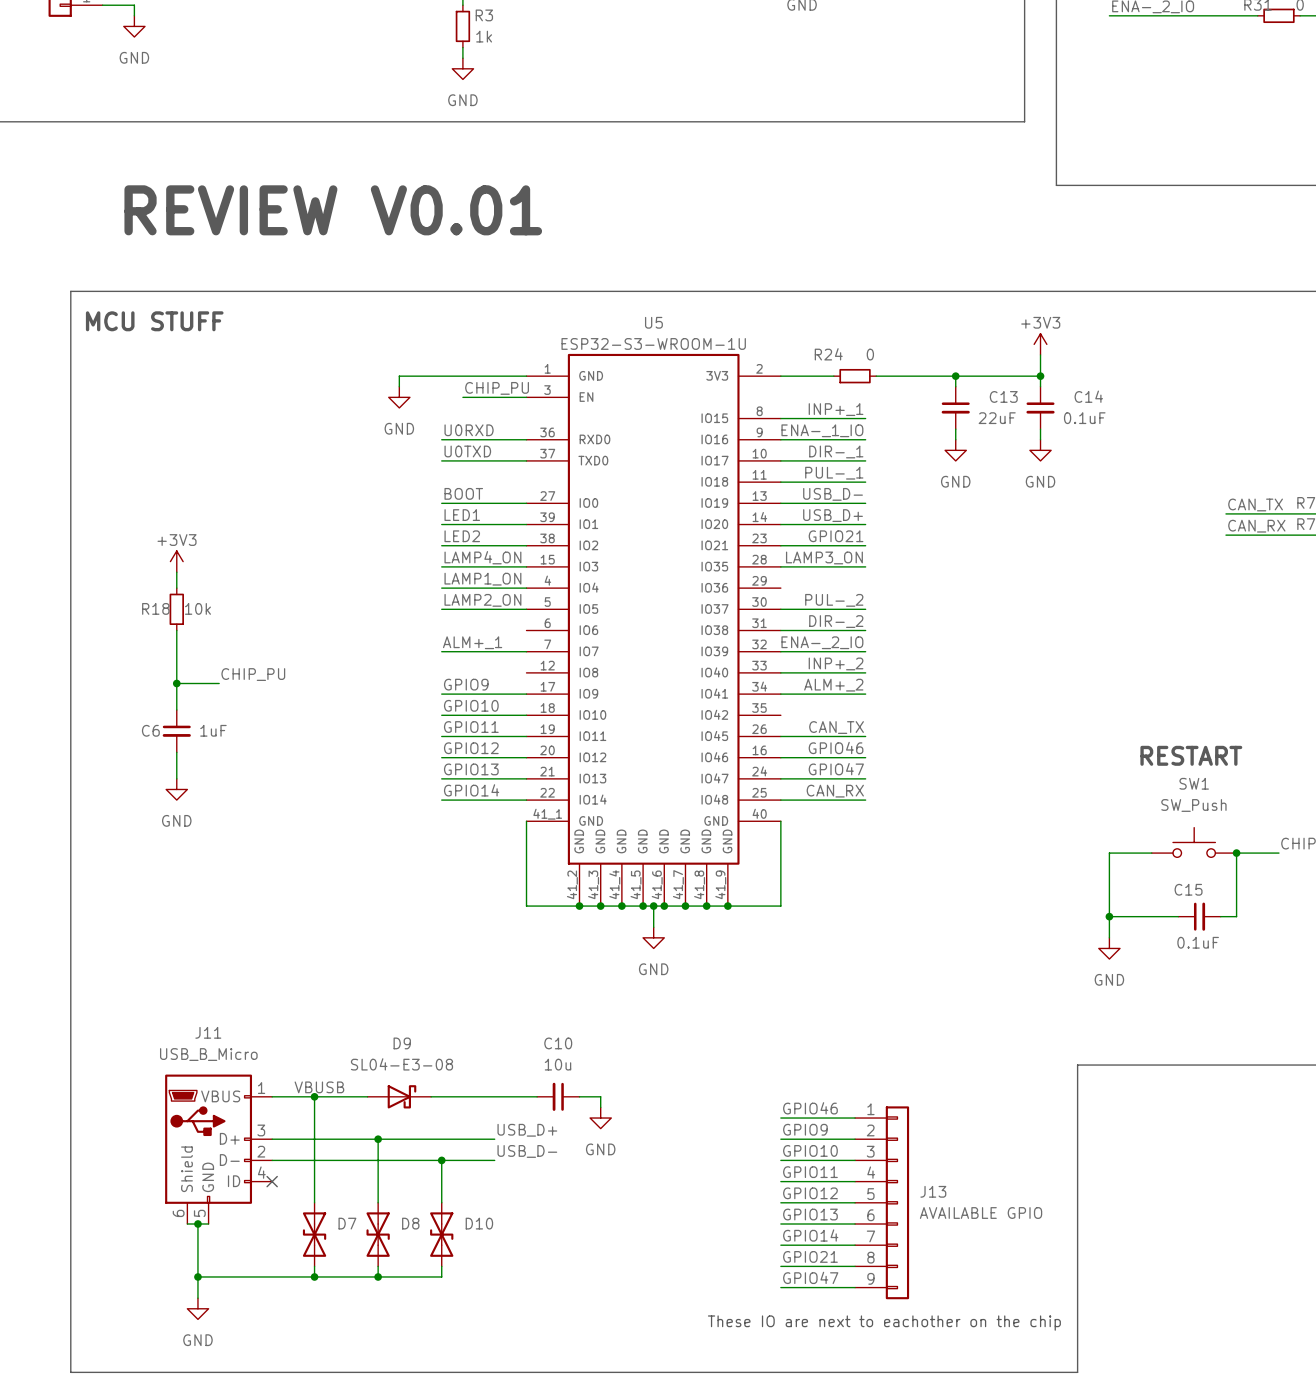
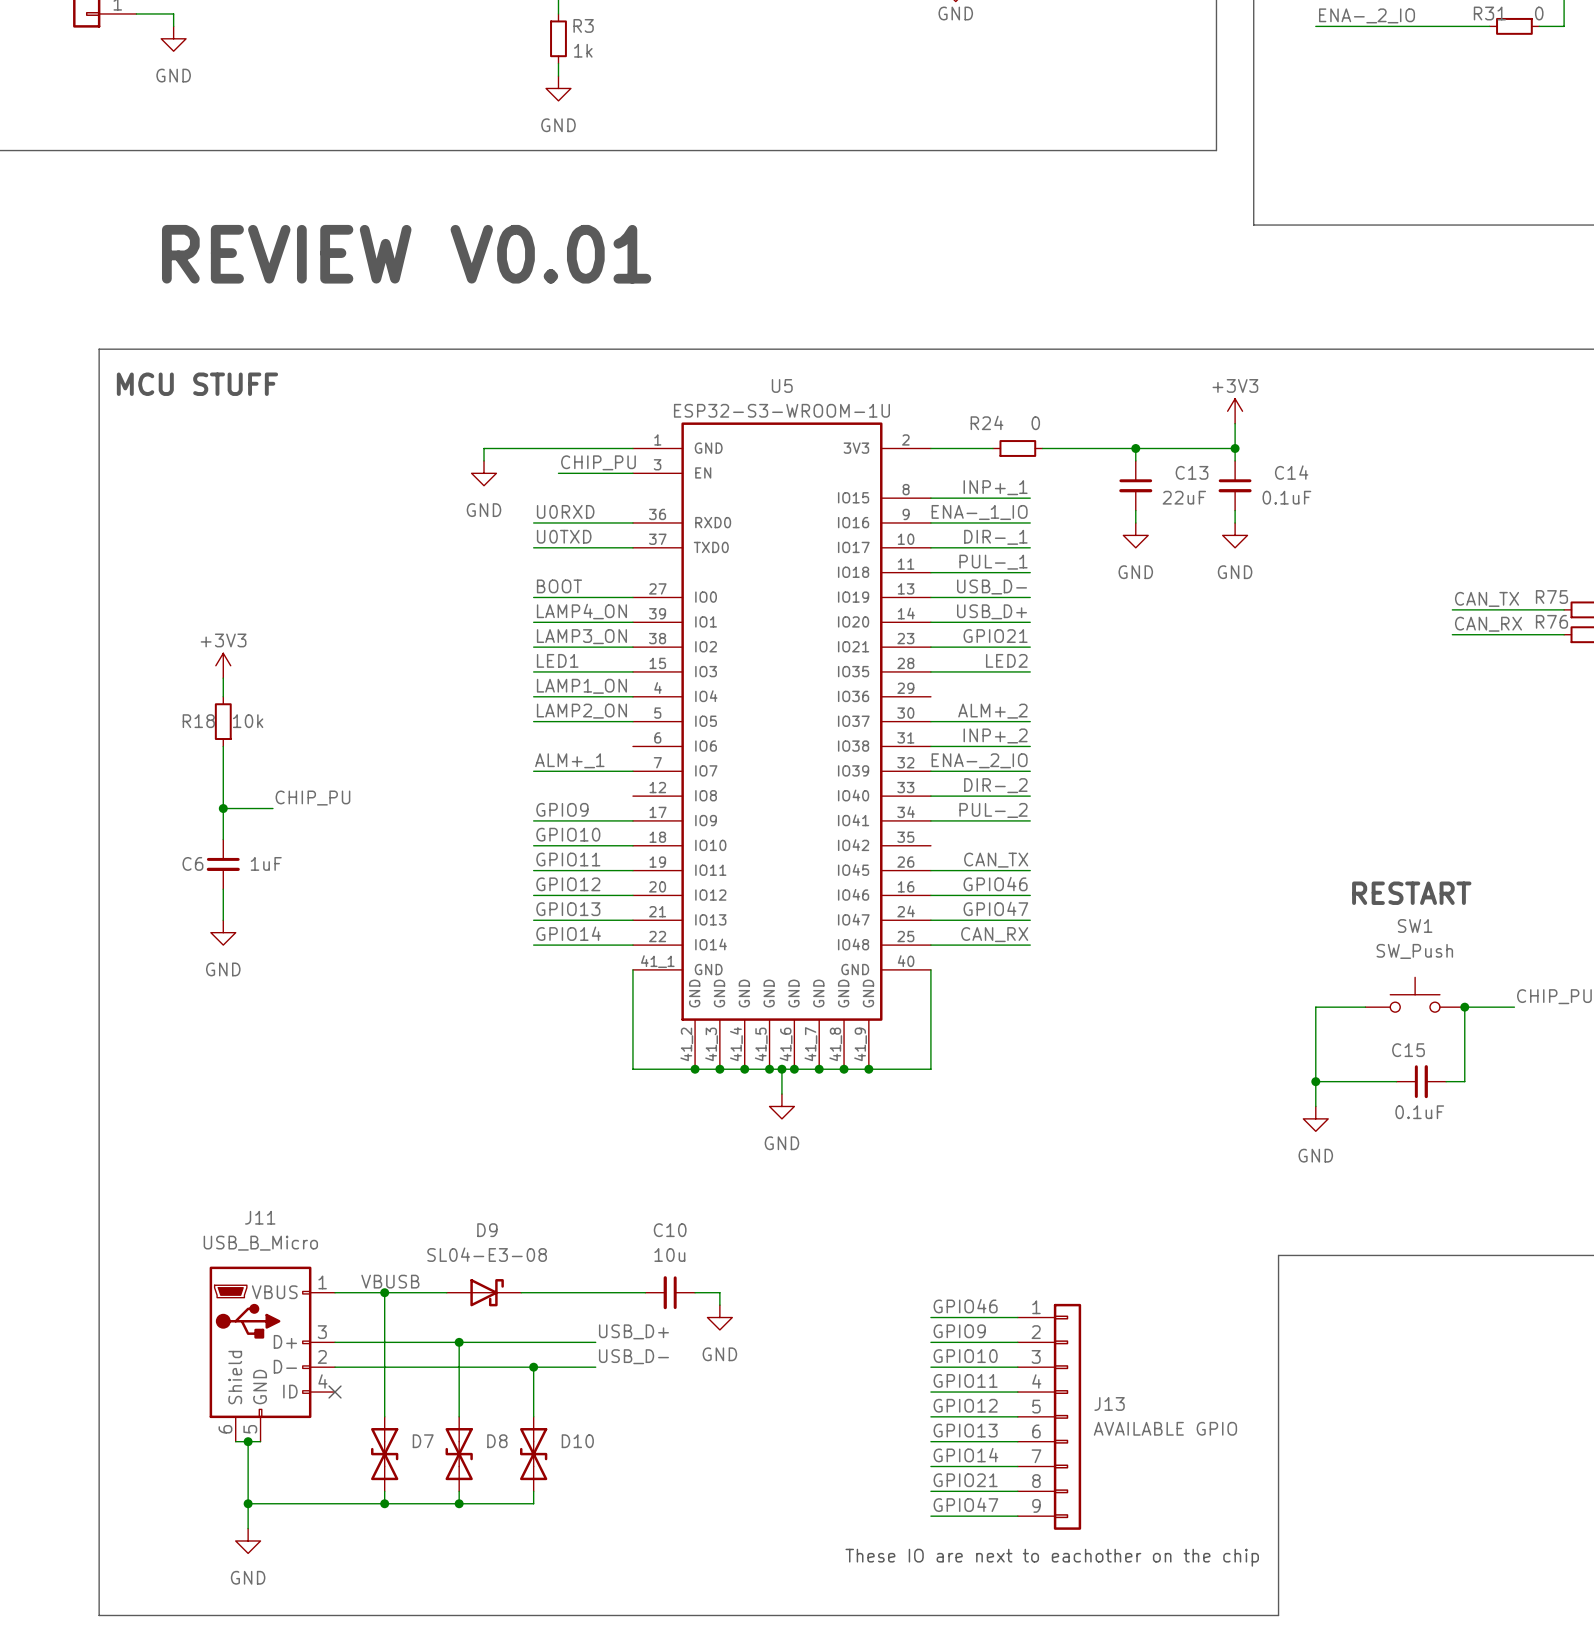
label: LED1 (462, 515) -> LAMP4_ON (581, 611)
label: LED2 (462, 536) -> LAMP3_ON (581, 636)
label: LAMP4_ON (482, 557) -> LED1 (557, 660)
label: LAMP3_ON (824, 557) -> LED2 (1006, 660)
label: PUL-_2 (834, 600) -> ALM+_2 (992, 711)
label: DIR-_2 (836, 621) -> INP+_2 (995, 735)
label: INP+_2 (836, 663) -> DIR-_2 (995, 785)
label: ALM+_2 (833, 685) -> PUL-_2 (993, 810)

